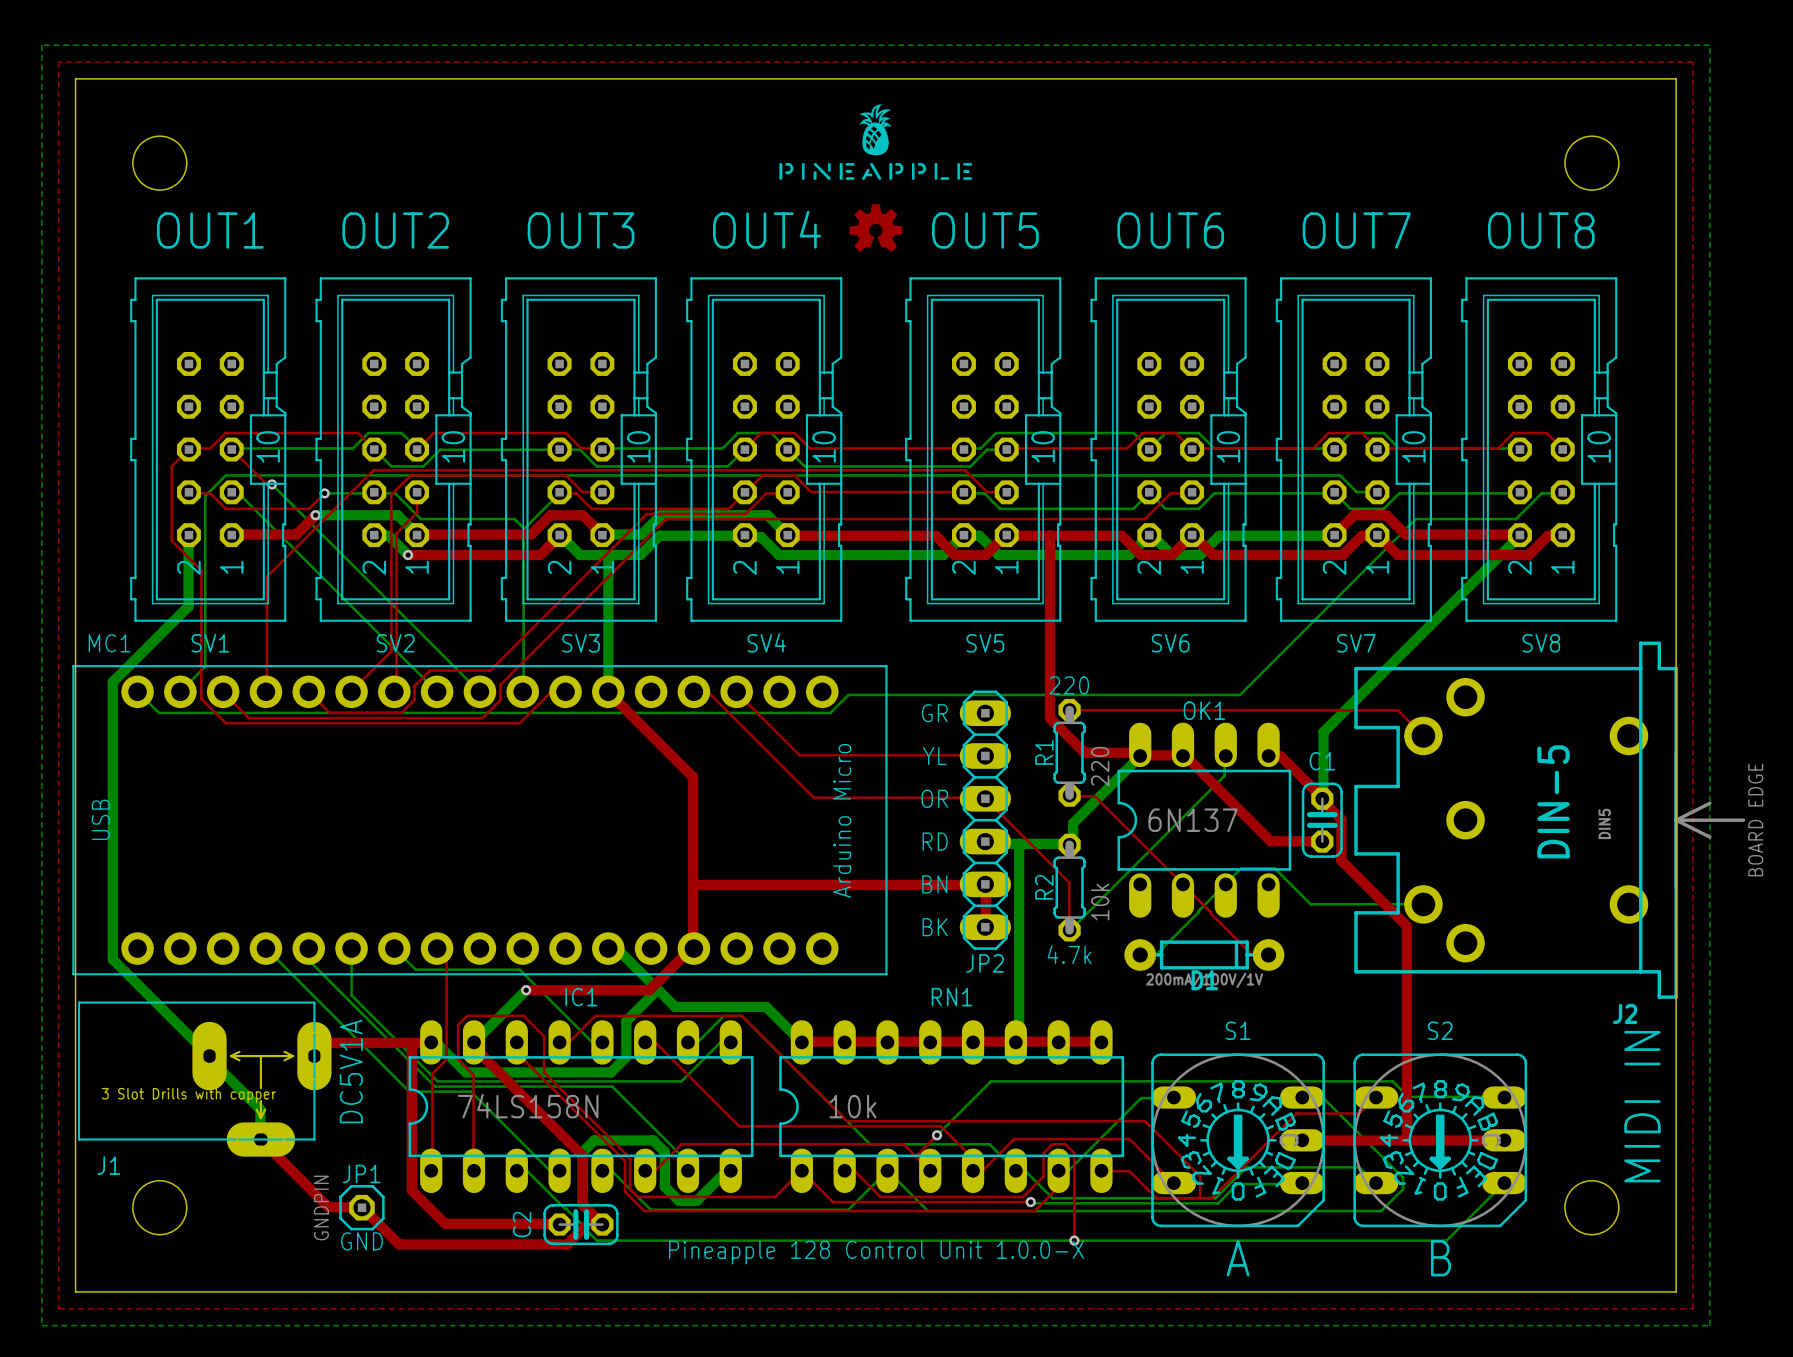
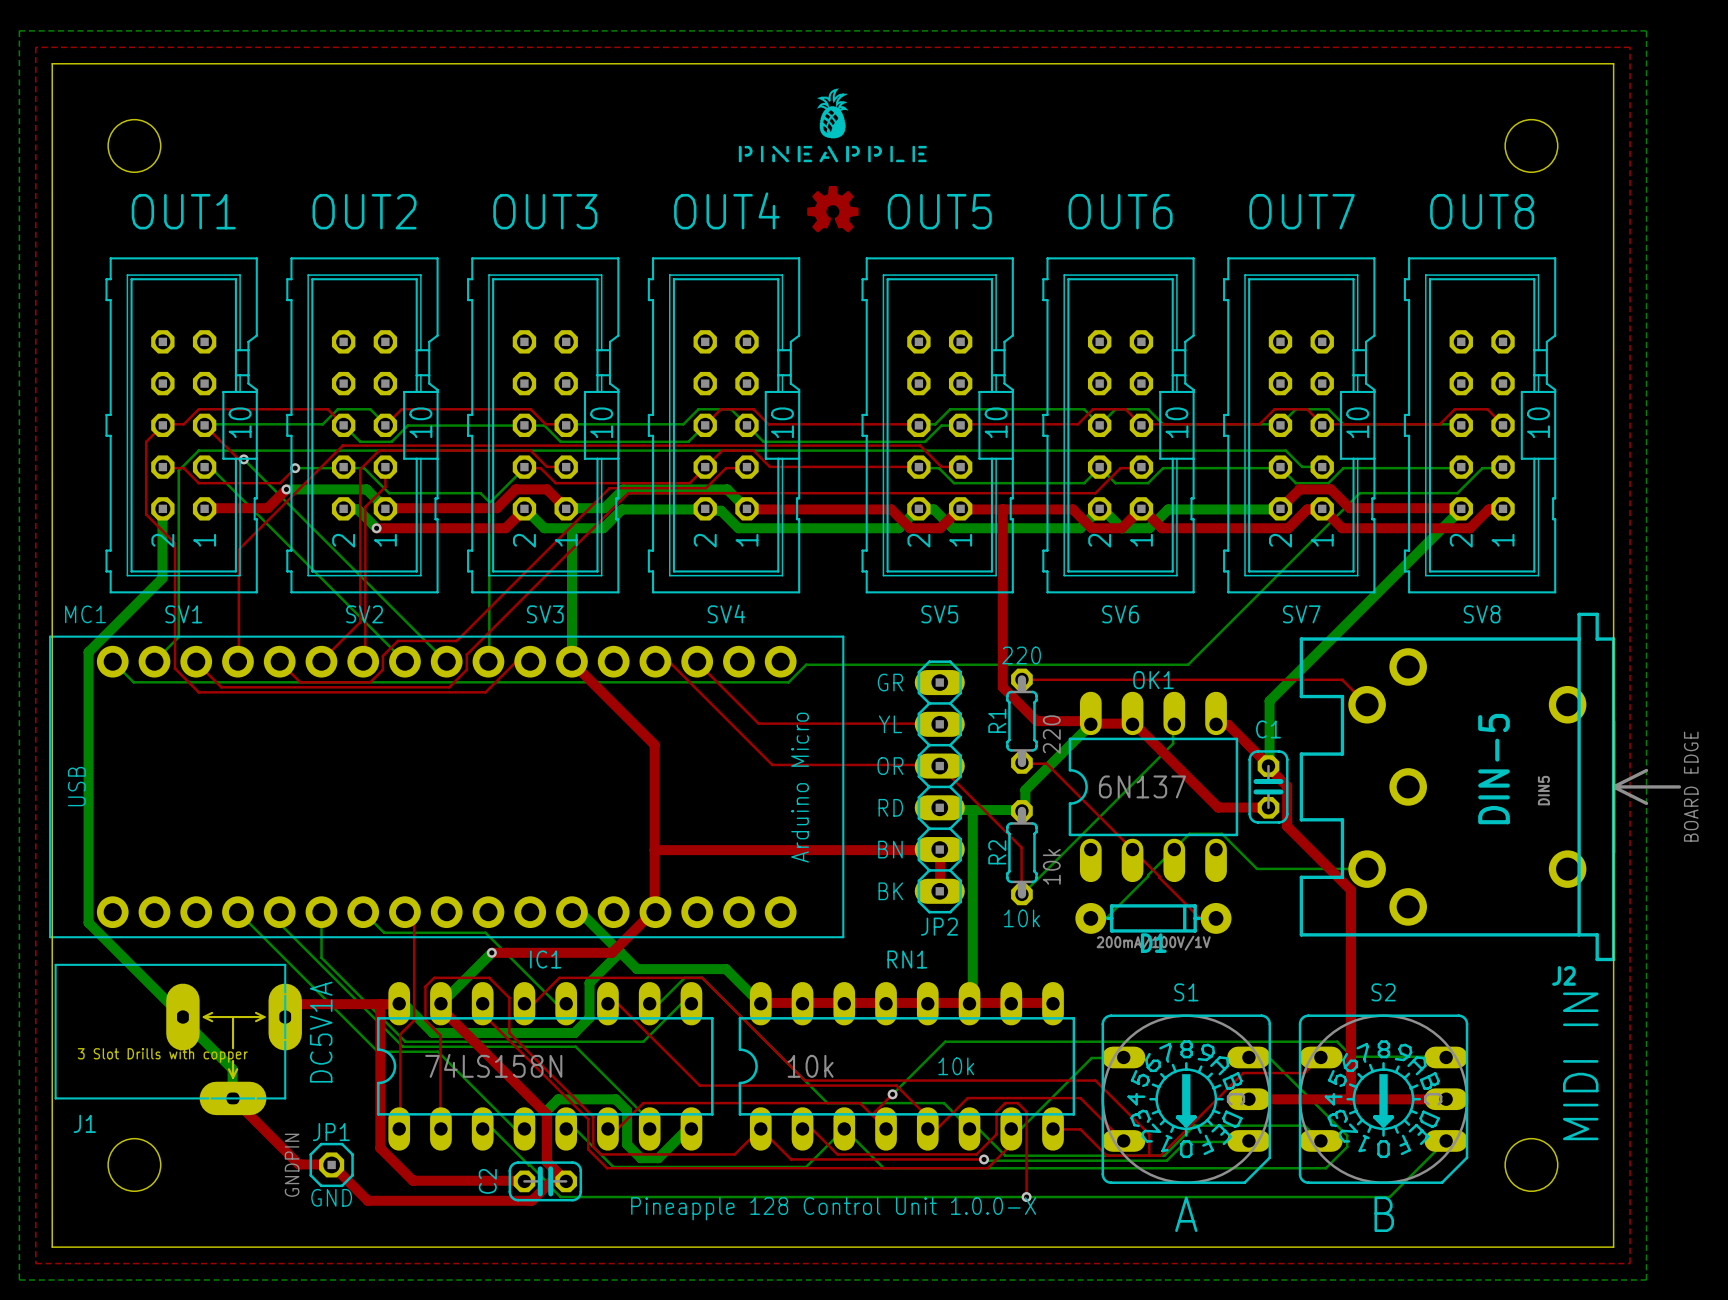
text: 4.7k (1069, 954) -> 10k (1021, 918)
text: none -> 10k (956, 1066)

